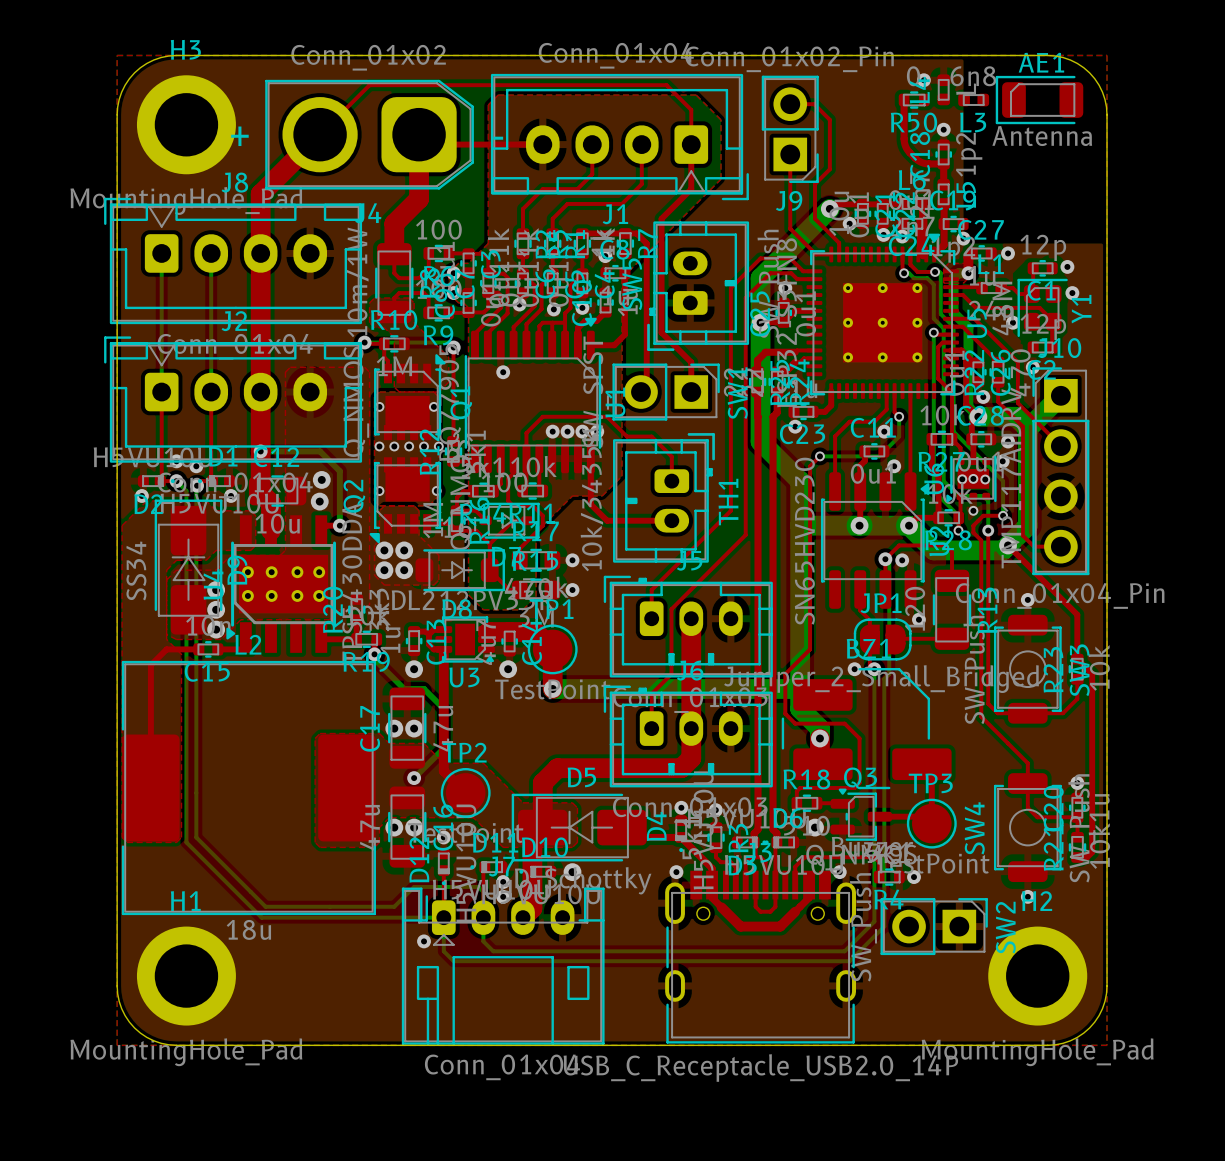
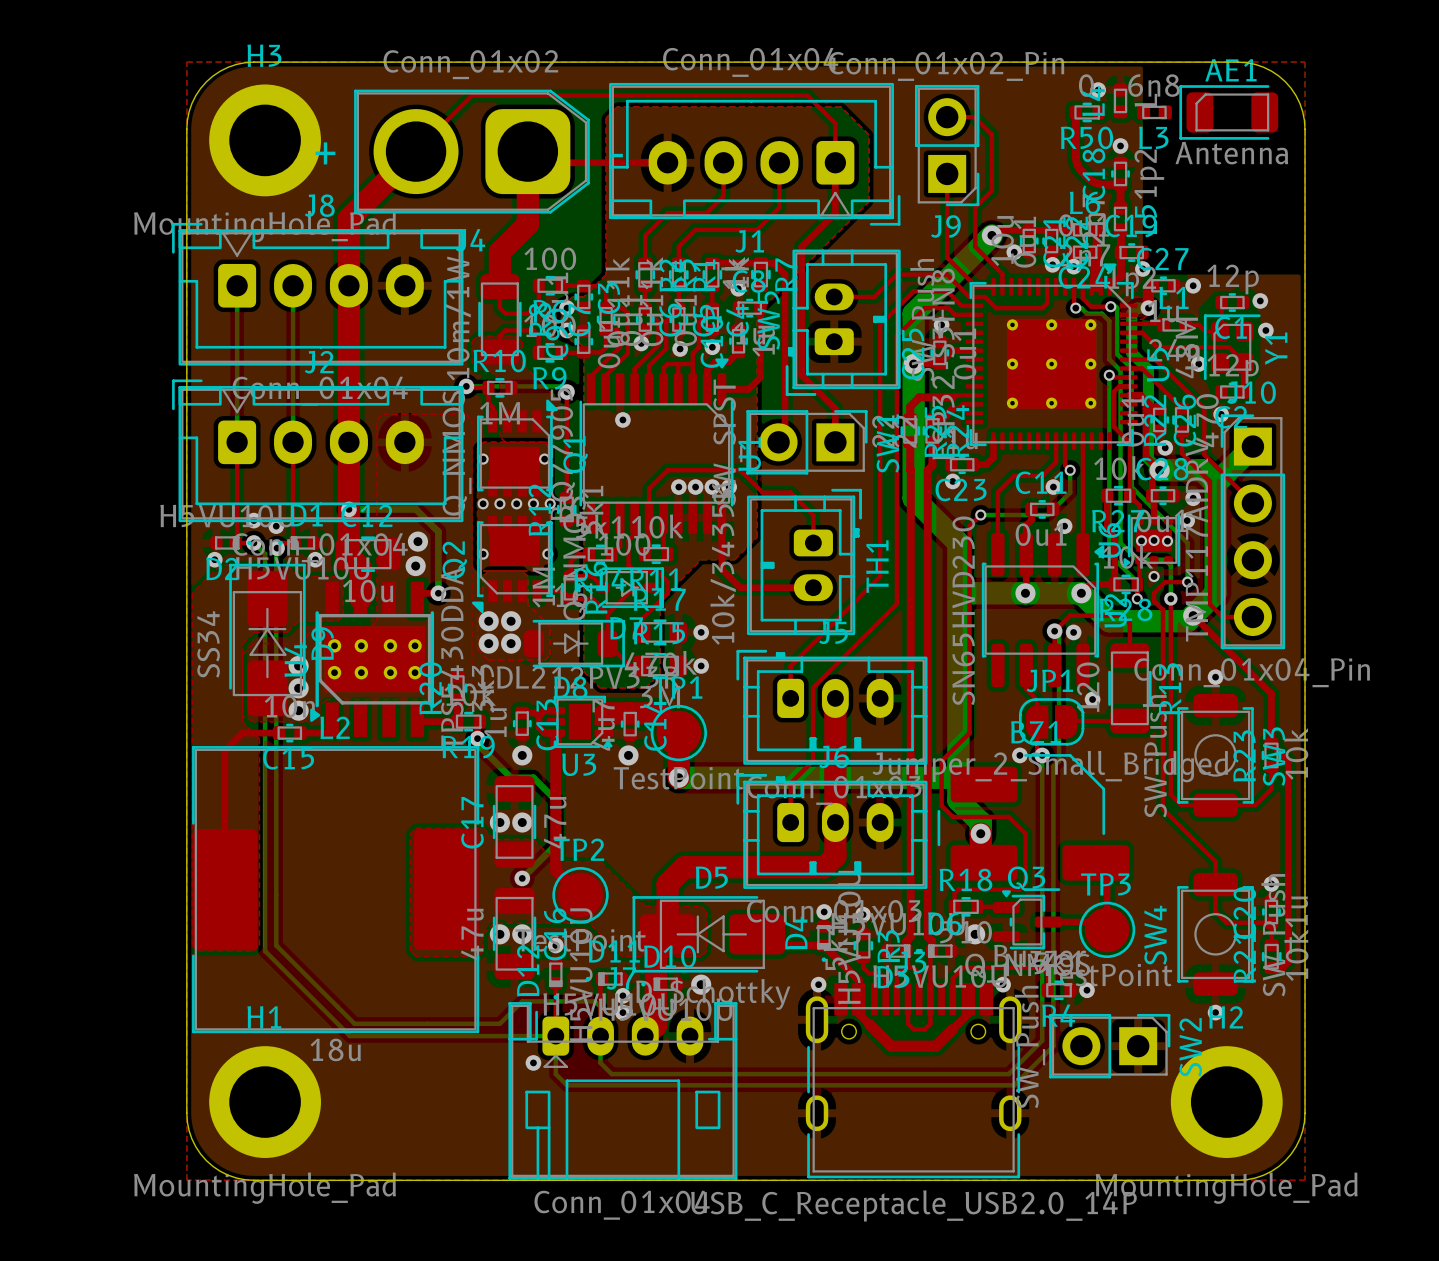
top track: none -> (1047, 286) (1047, 303) (1042, 308) (996, 308) (985, 296) (969, 296) (947, 274) (896, 274) (874, 296) (834, 296)

